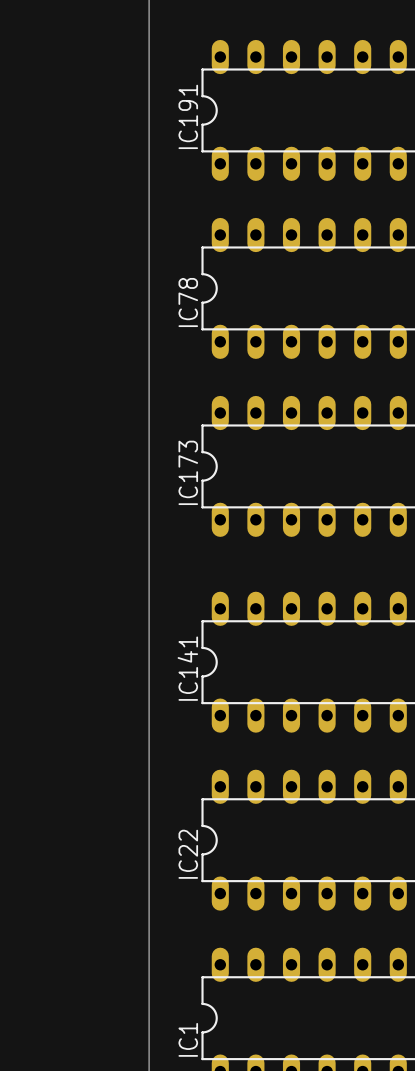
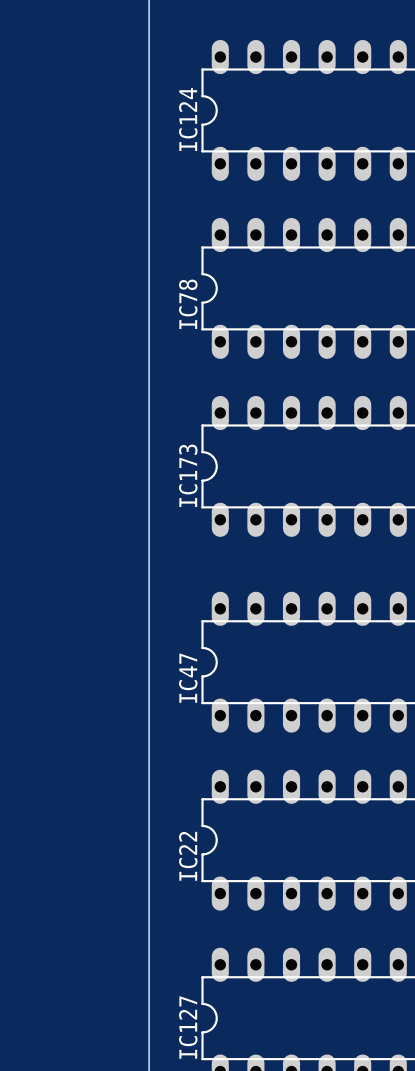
IC191 name: IC191 (188, 116) -> IC124 (188, 119)
IC141 name: IC141 (187, 668) -> IC47 (188, 678)
IC1 name: IC1 (188, 1039) -> IC127 (188, 1027)

